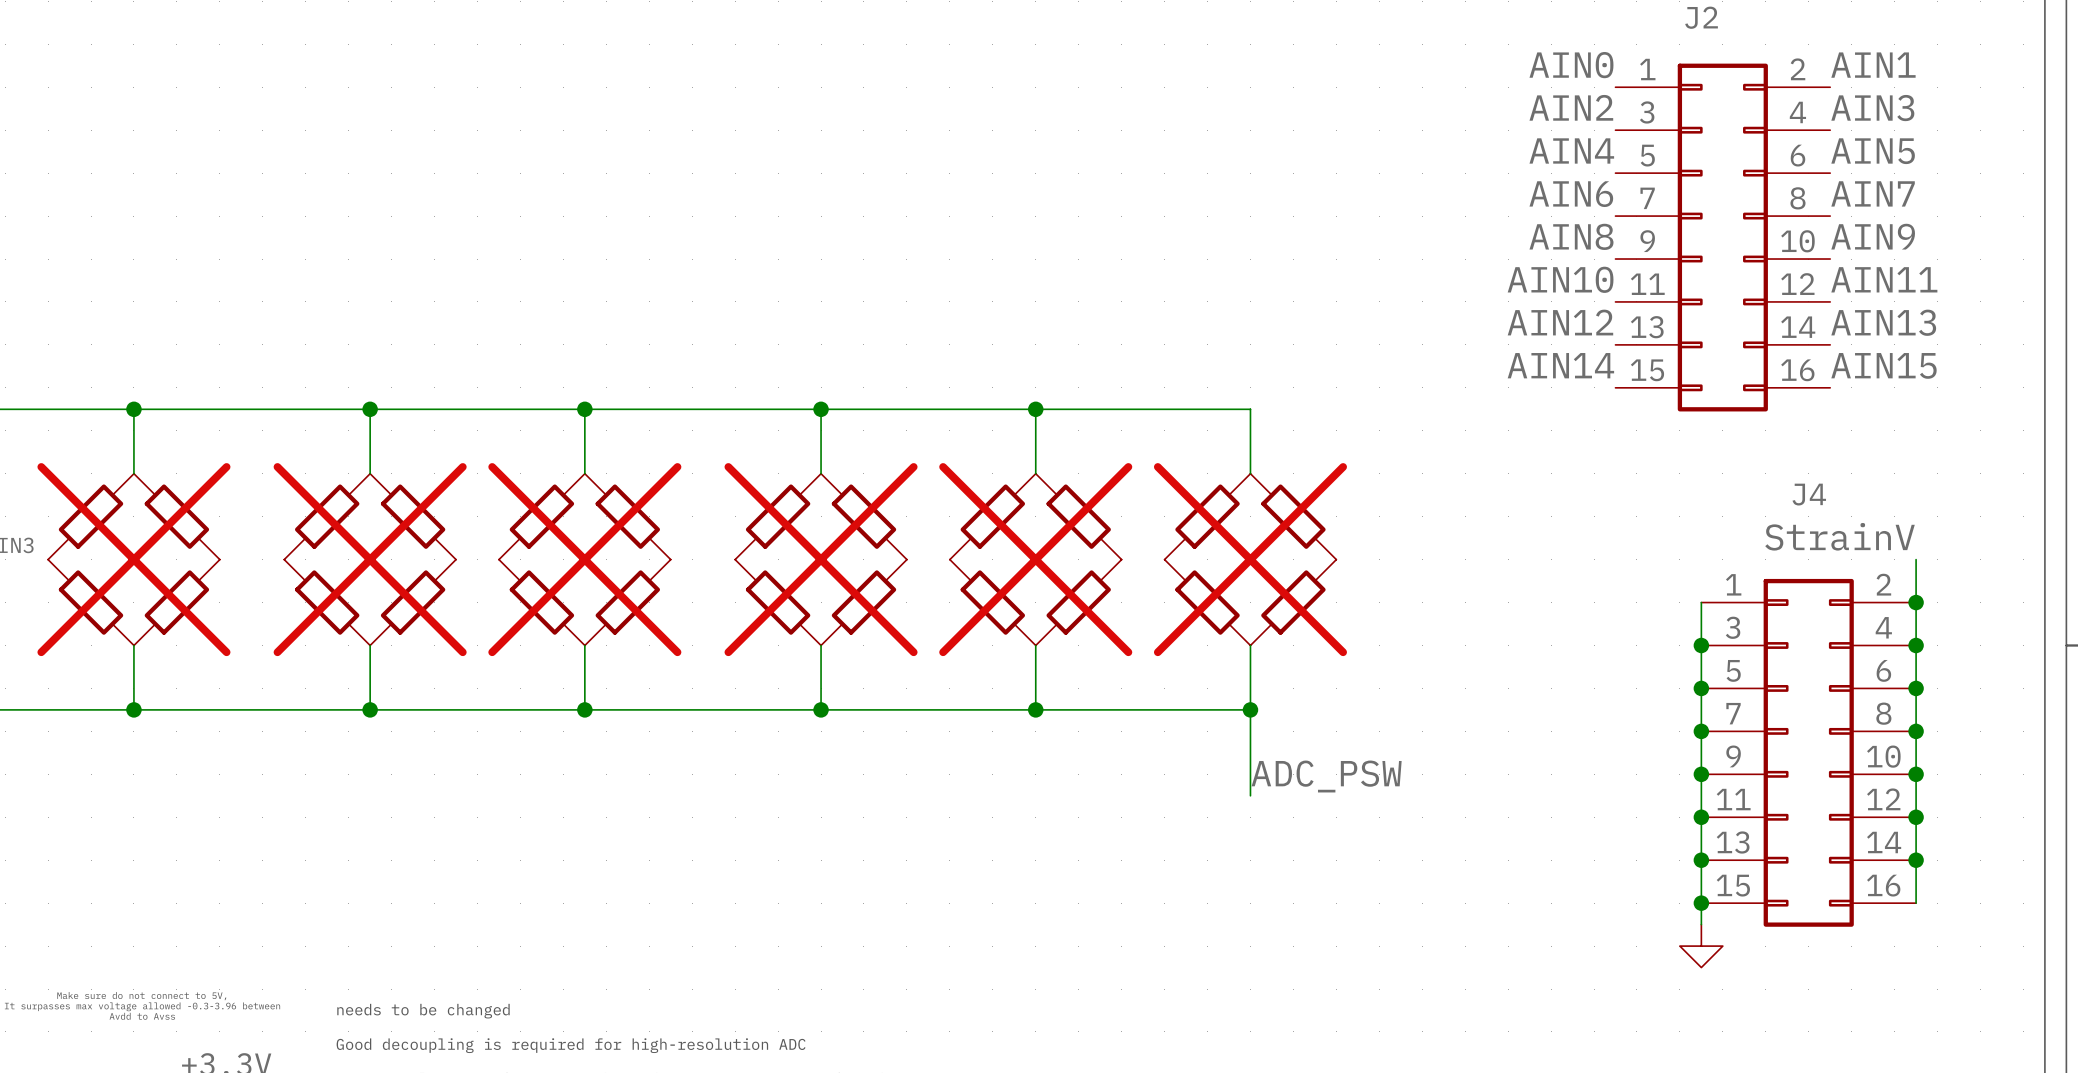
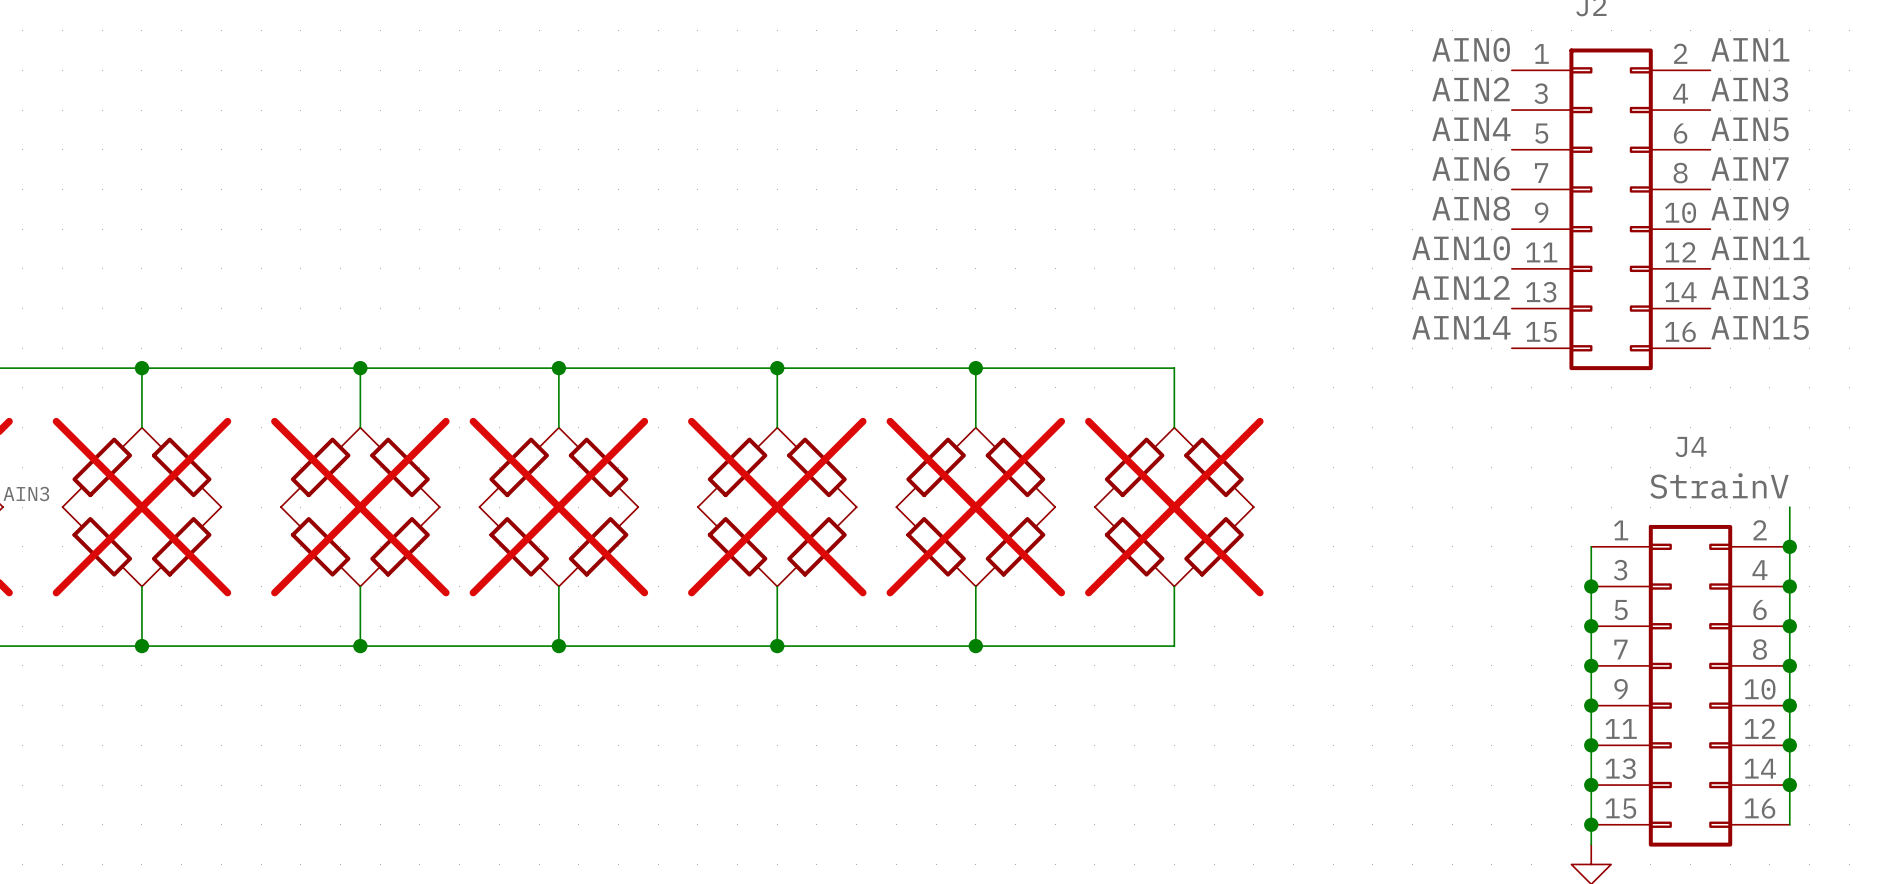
wire: (1250, 709) (1250, 795) -> none
junction: (1250, 709) -> none
label: ADC_PSW (1326, 776) -> none

